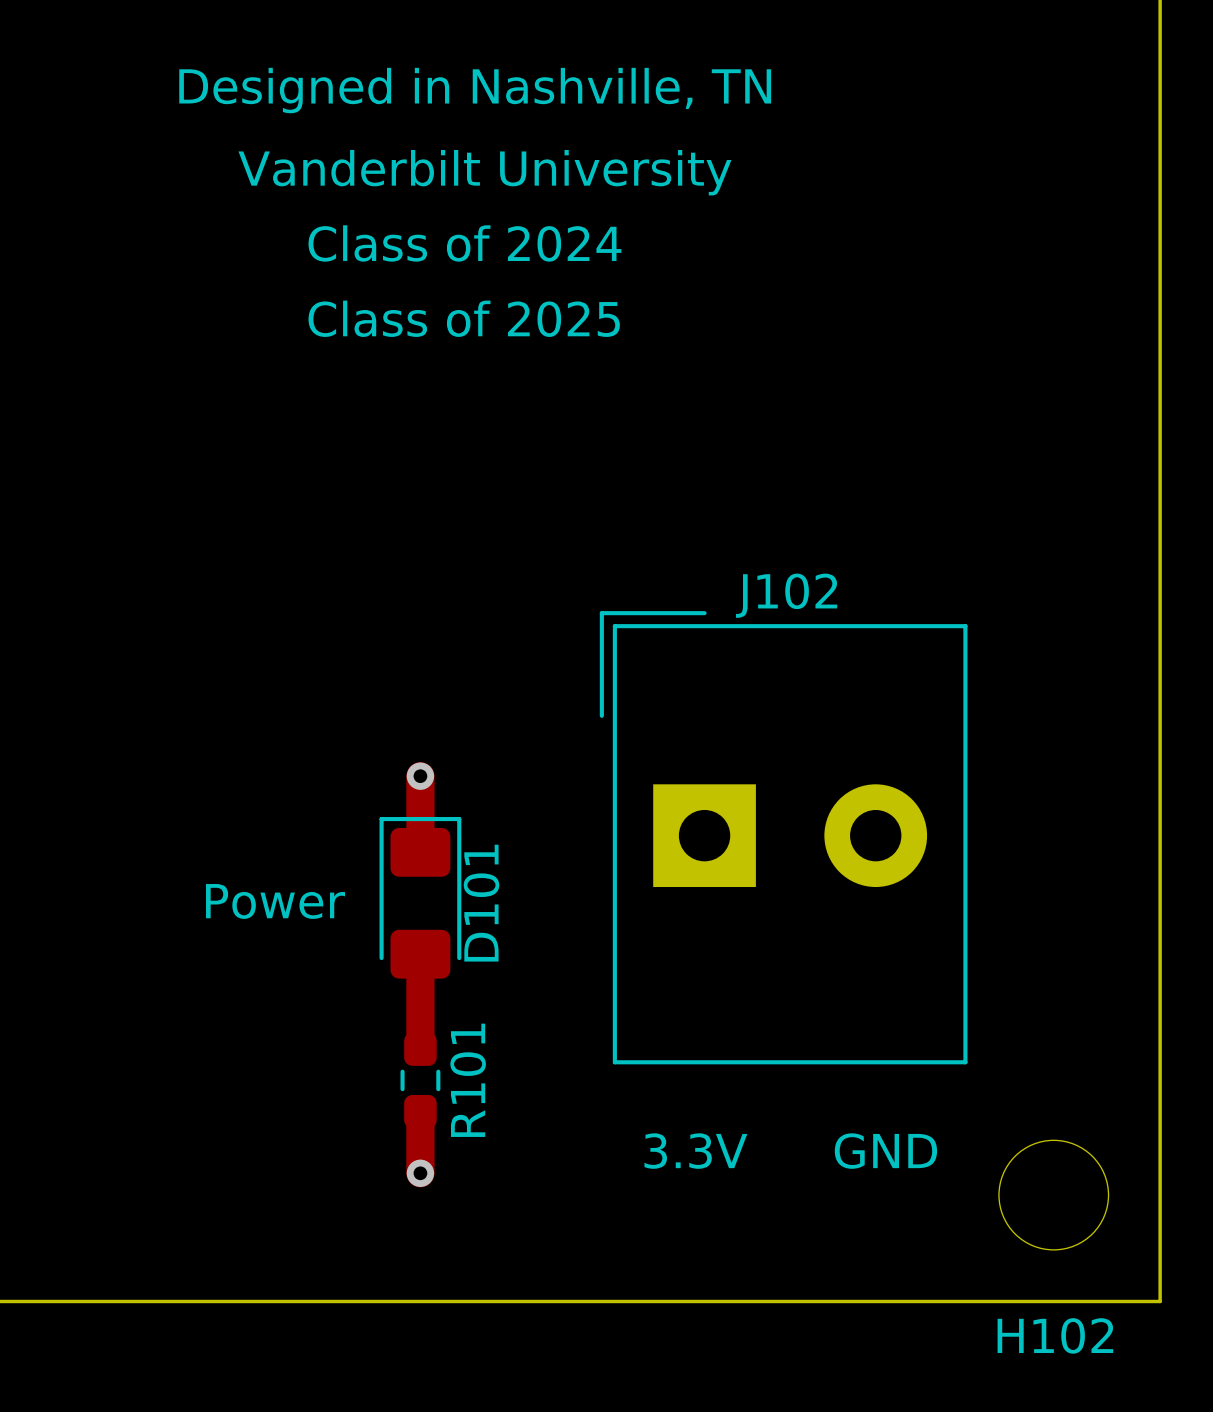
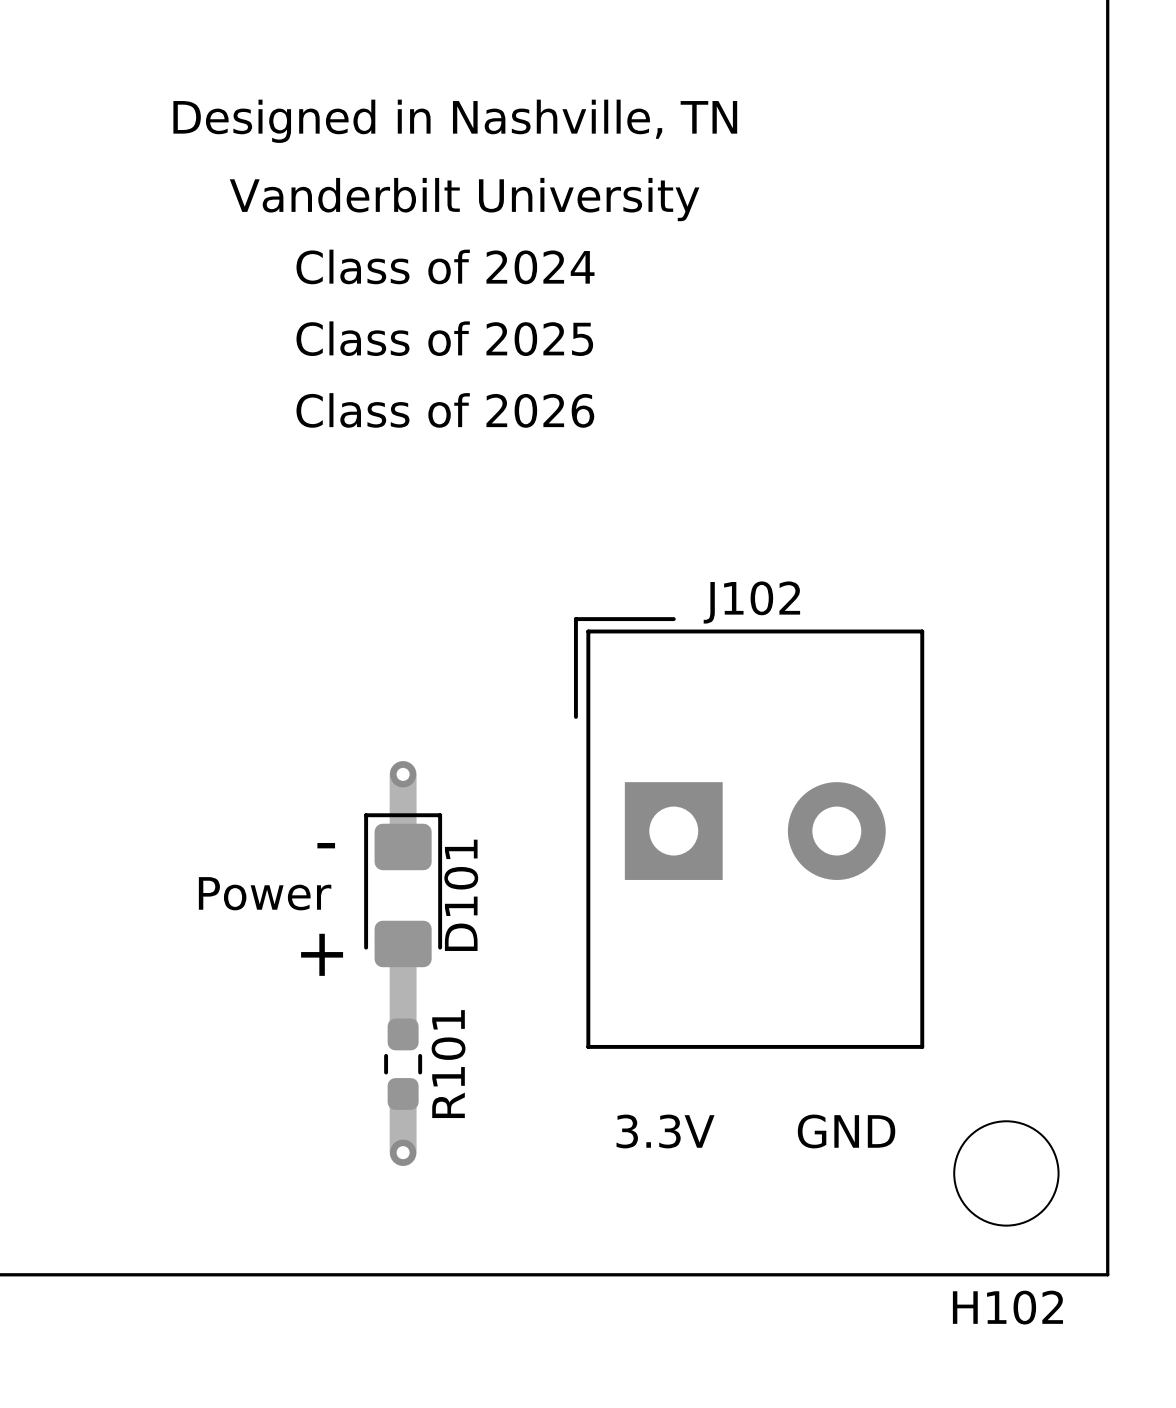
text: none -> Class of 2026 (445, 410)
text: none -> - (326, 845)
text: none -> + (322, 954)

